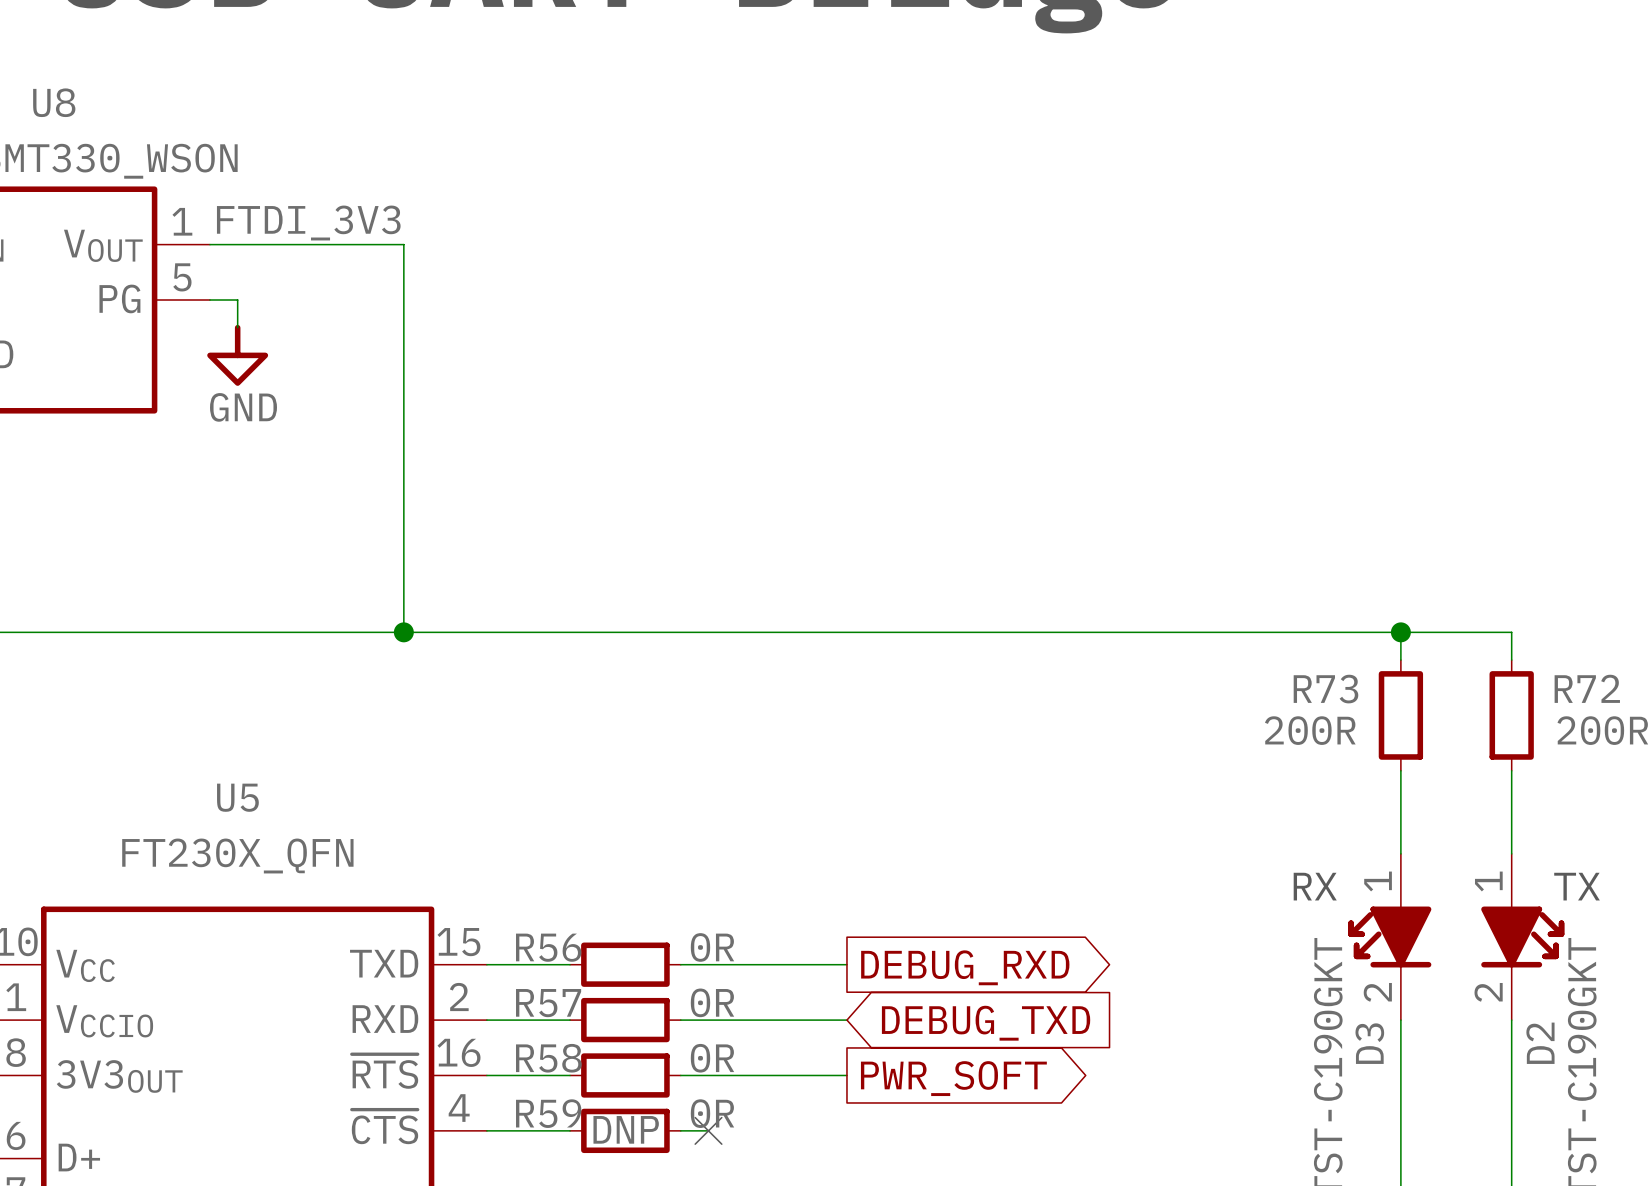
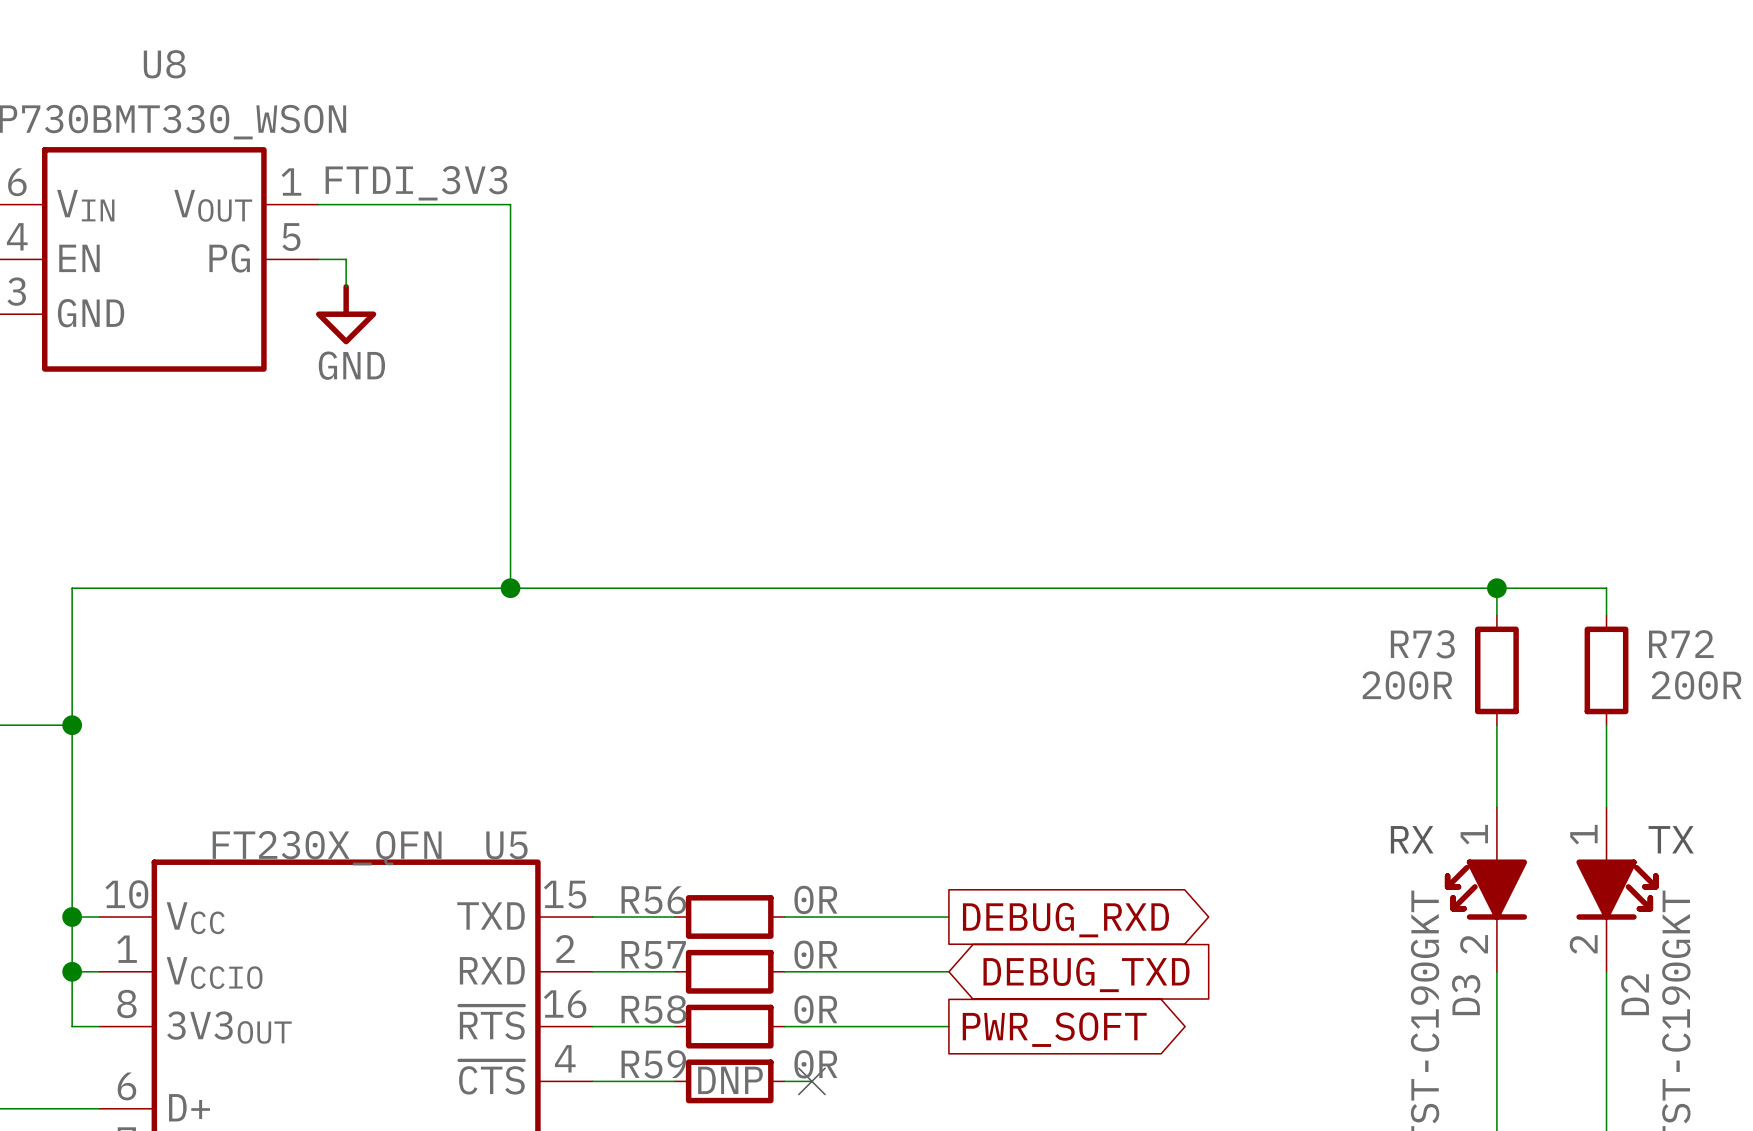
U5 name position: U5 (237, 797) -> U5 (506, 845)
U5 value position: FT230X_QFN (237, 855) -> FT230X_QFN (327, 848)

